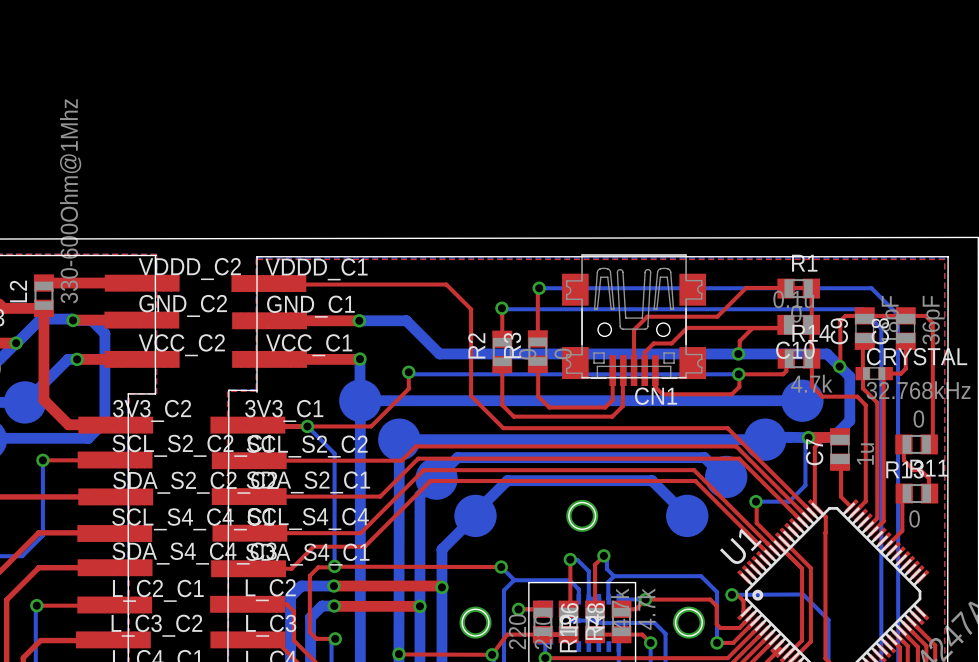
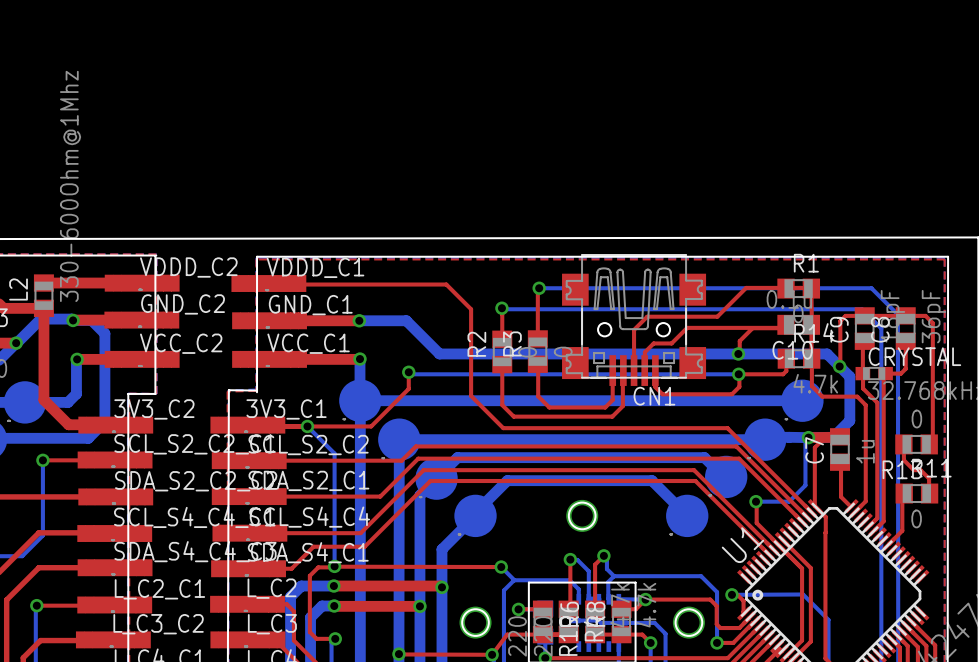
bottom track: (77, 359) (67, 359) (24, 402) -> (77, 359) (76, 393) (67, 402) (24, 402)

